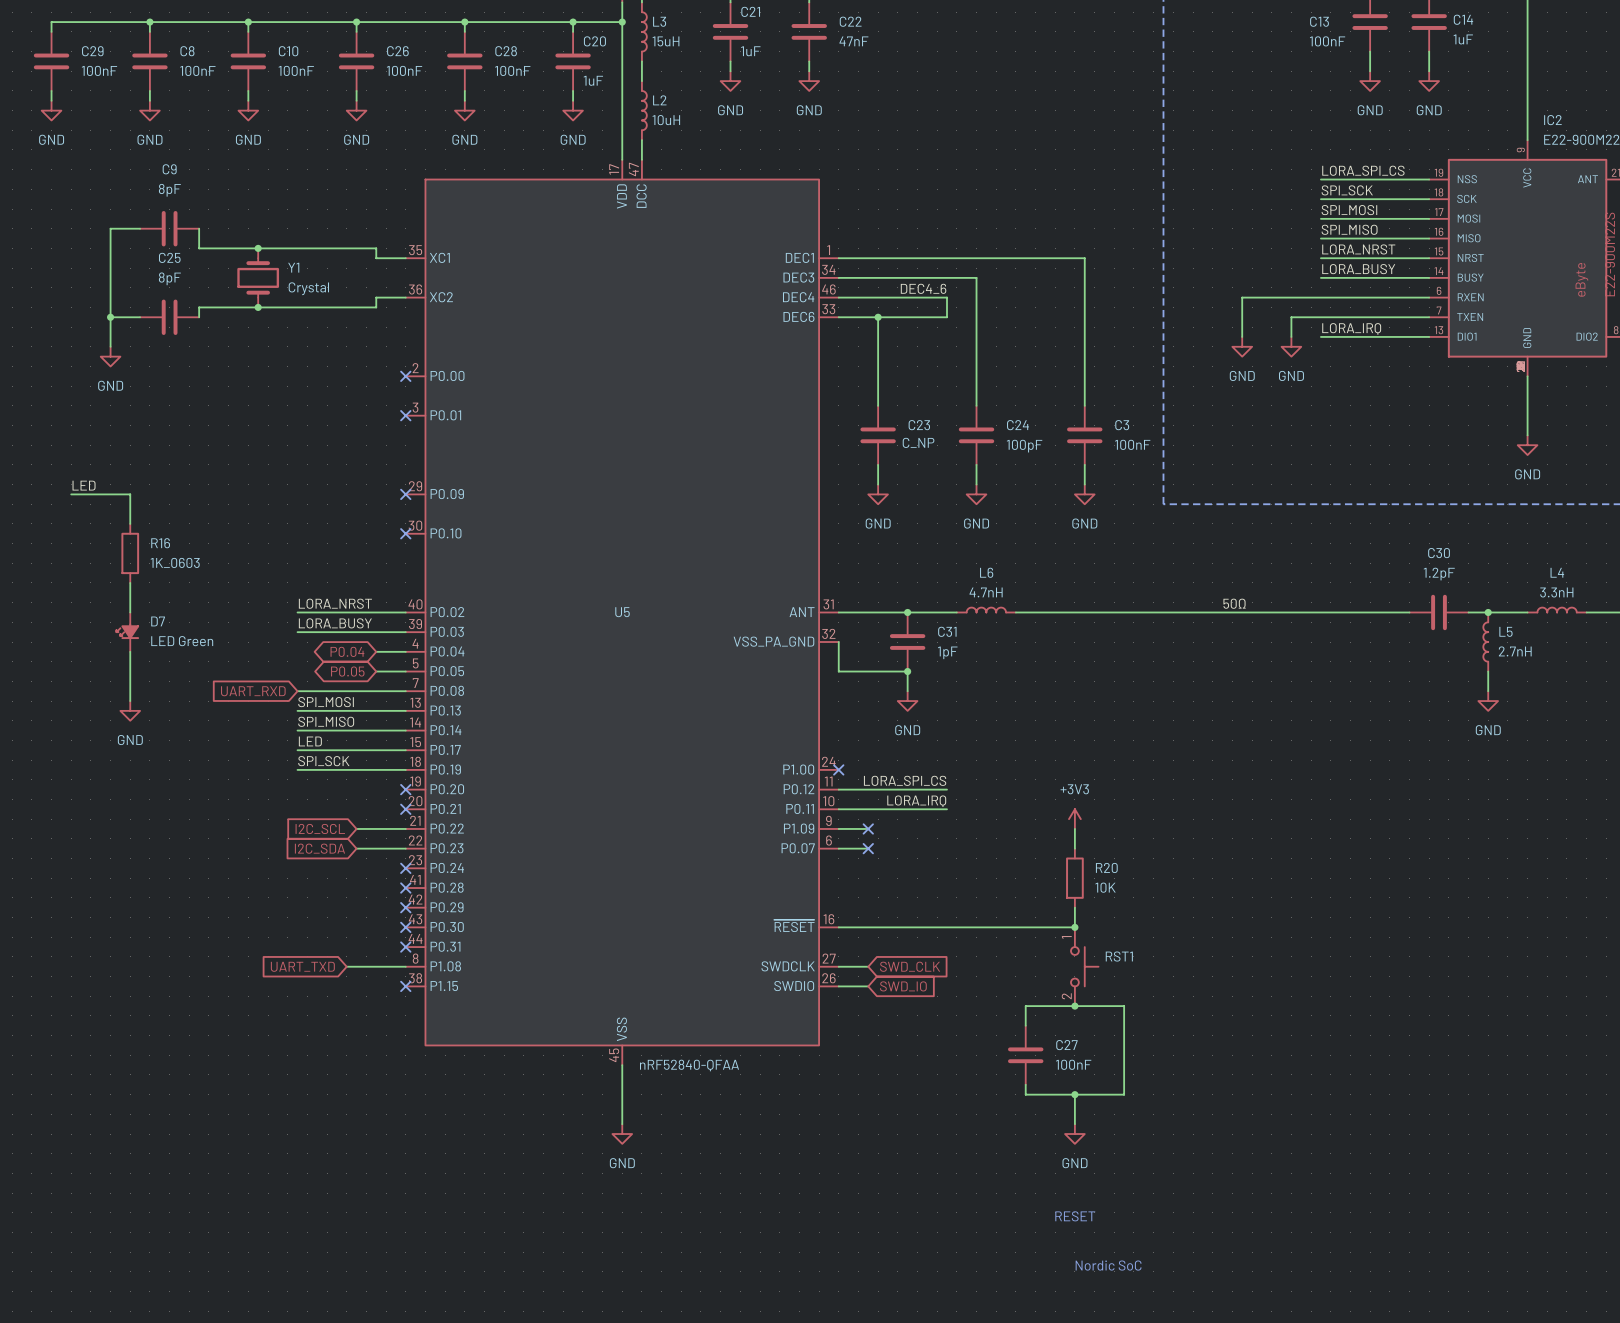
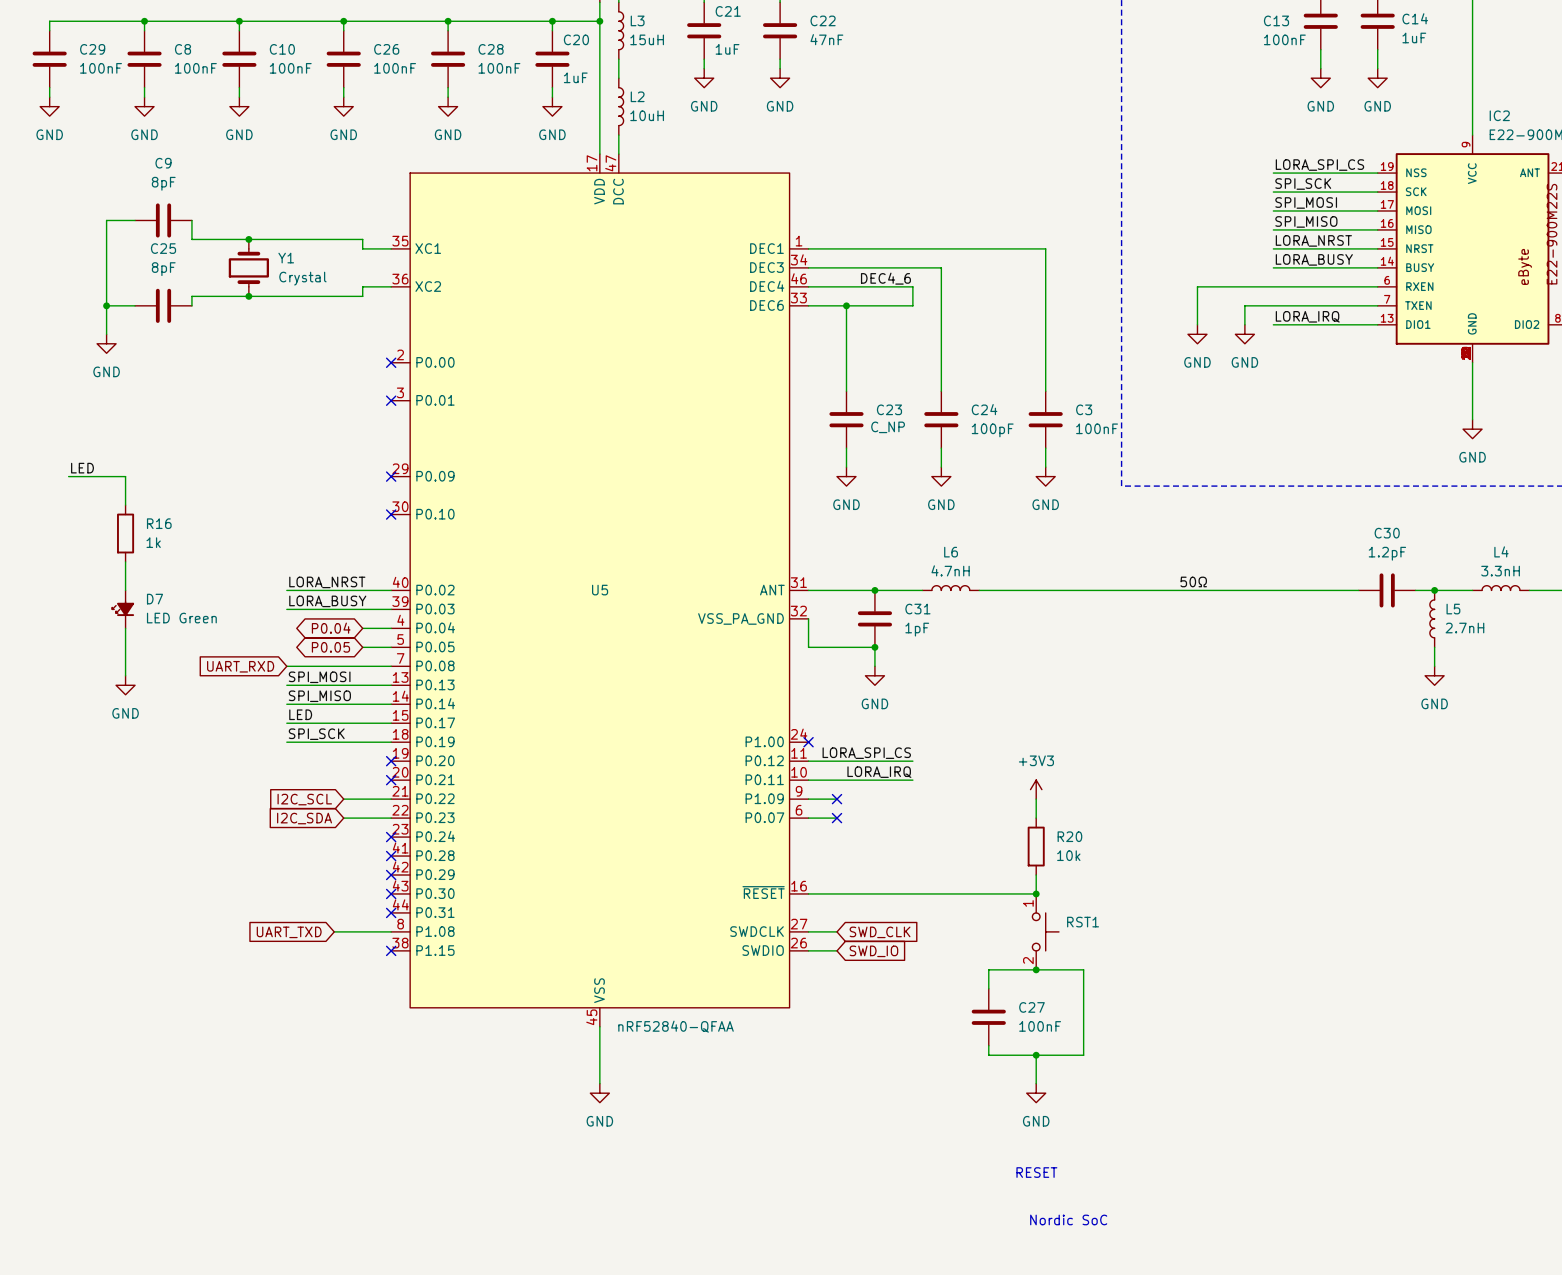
R16 value: 1K_0603 (175, 562) -> 1k (153, 542)
R20 value: 10K (1105, 887) -> 10k (1068, 855)

